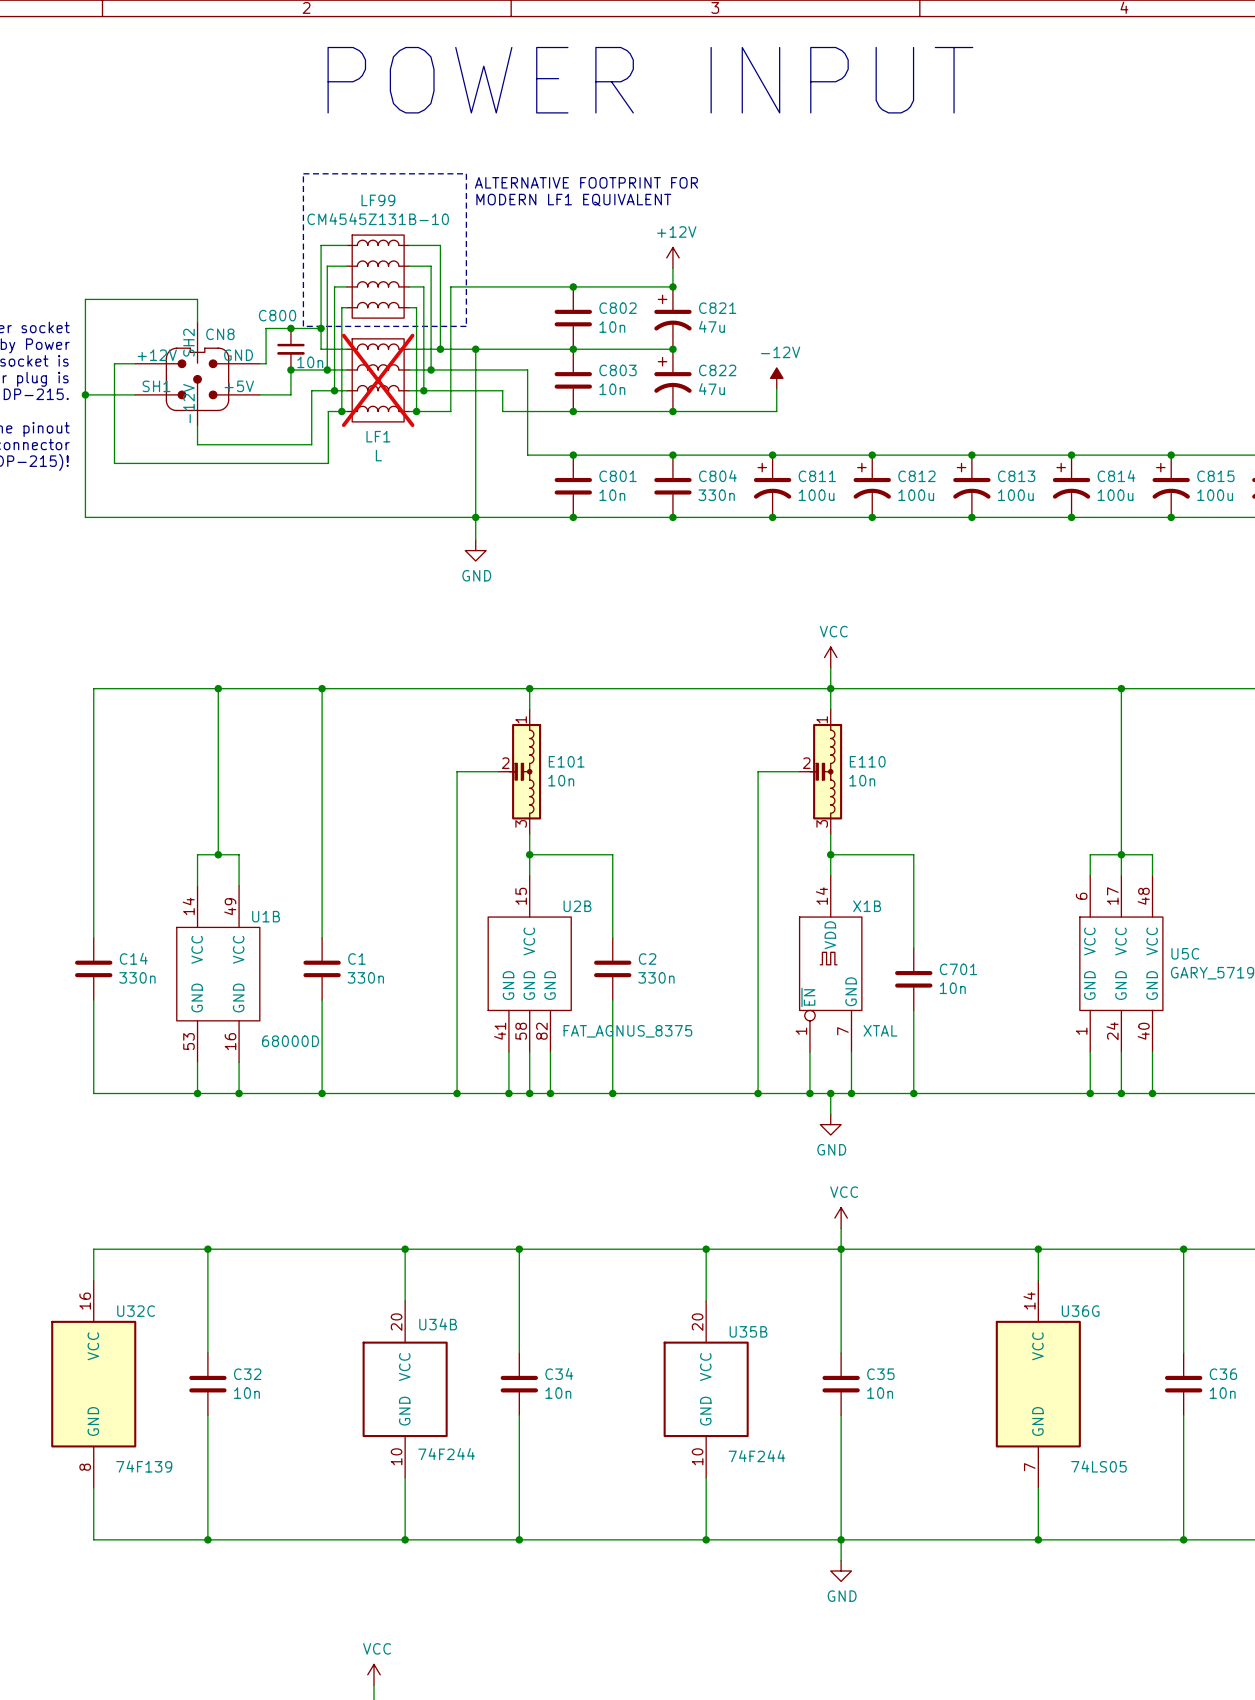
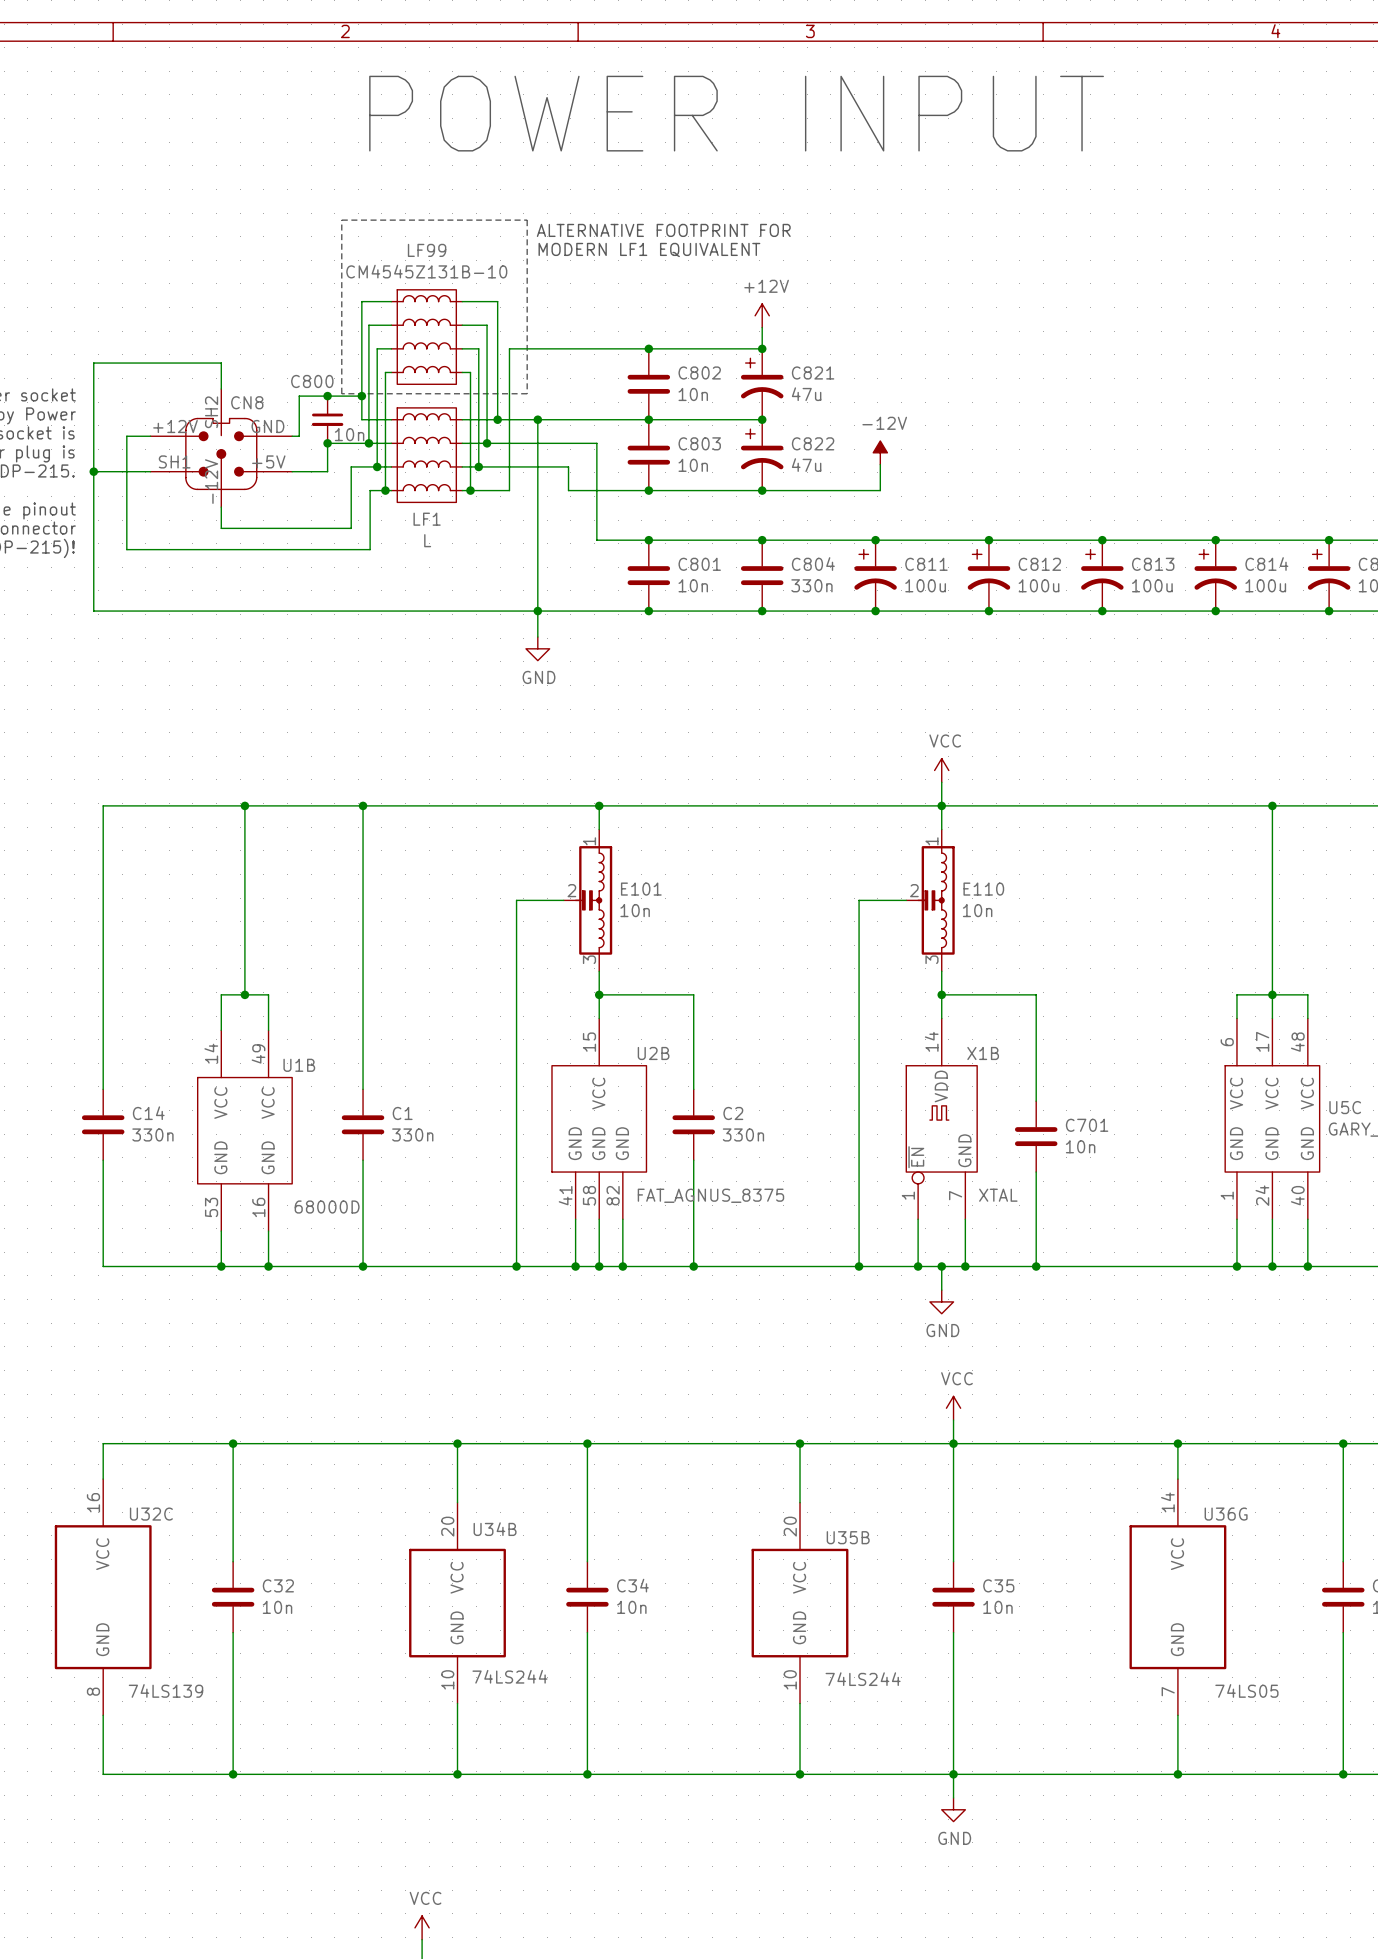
LF1 do-not-place cross: (378, 380) -> none
U34B value: 74F244 (446, 1454) -> 74LS244 (509, 1676)
U35B value: 74F244 (756, 1456) -> 74LS244 (863, 1679)
U32C value: 74F139 (144, 1466) -> 74LS139 (166, 1690)

